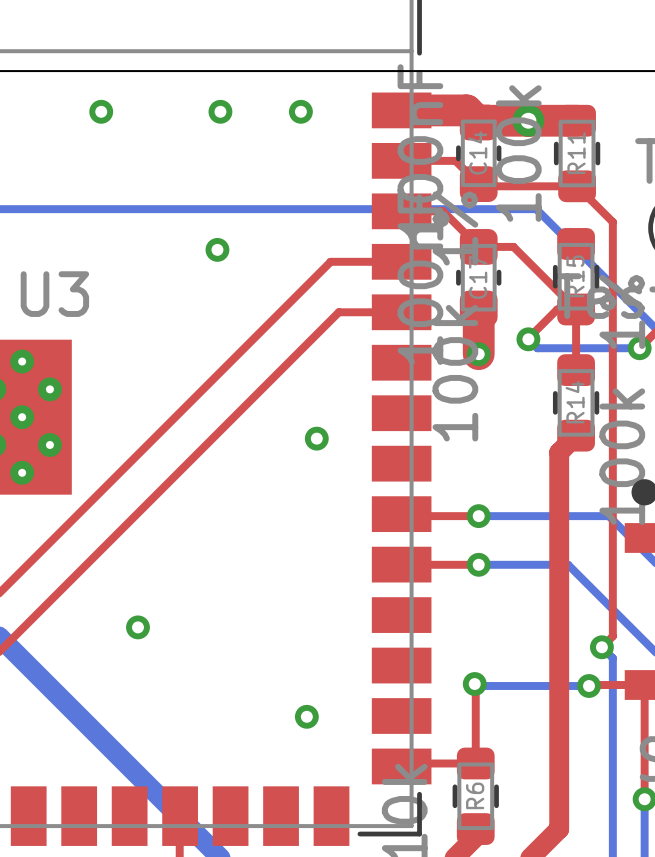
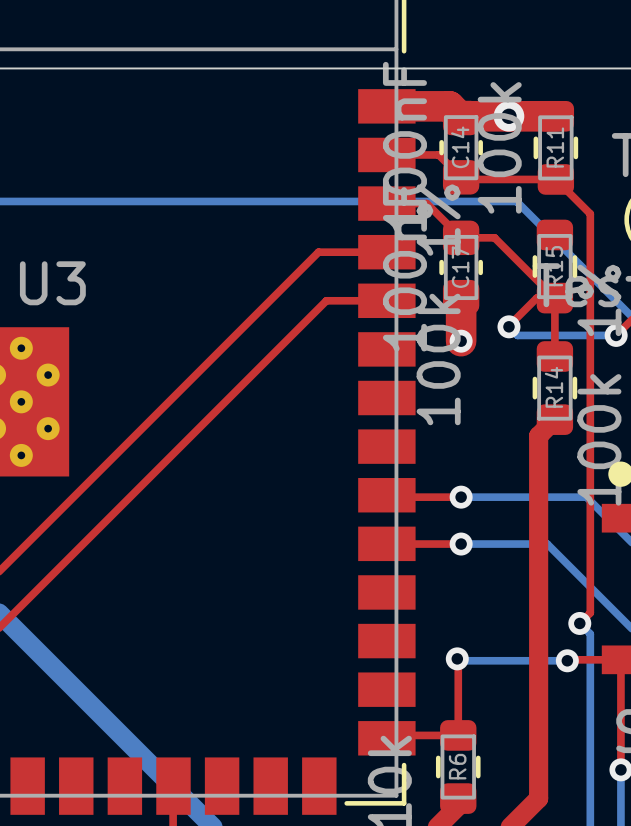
via: (101, 111) -> none
via: (220, 111) -> none
via: (300, 111) -> none
via: (217, 249) -> none
via: (316, 438) -> none
via: (137, 627) -> none
via: (306, 716) -> none

